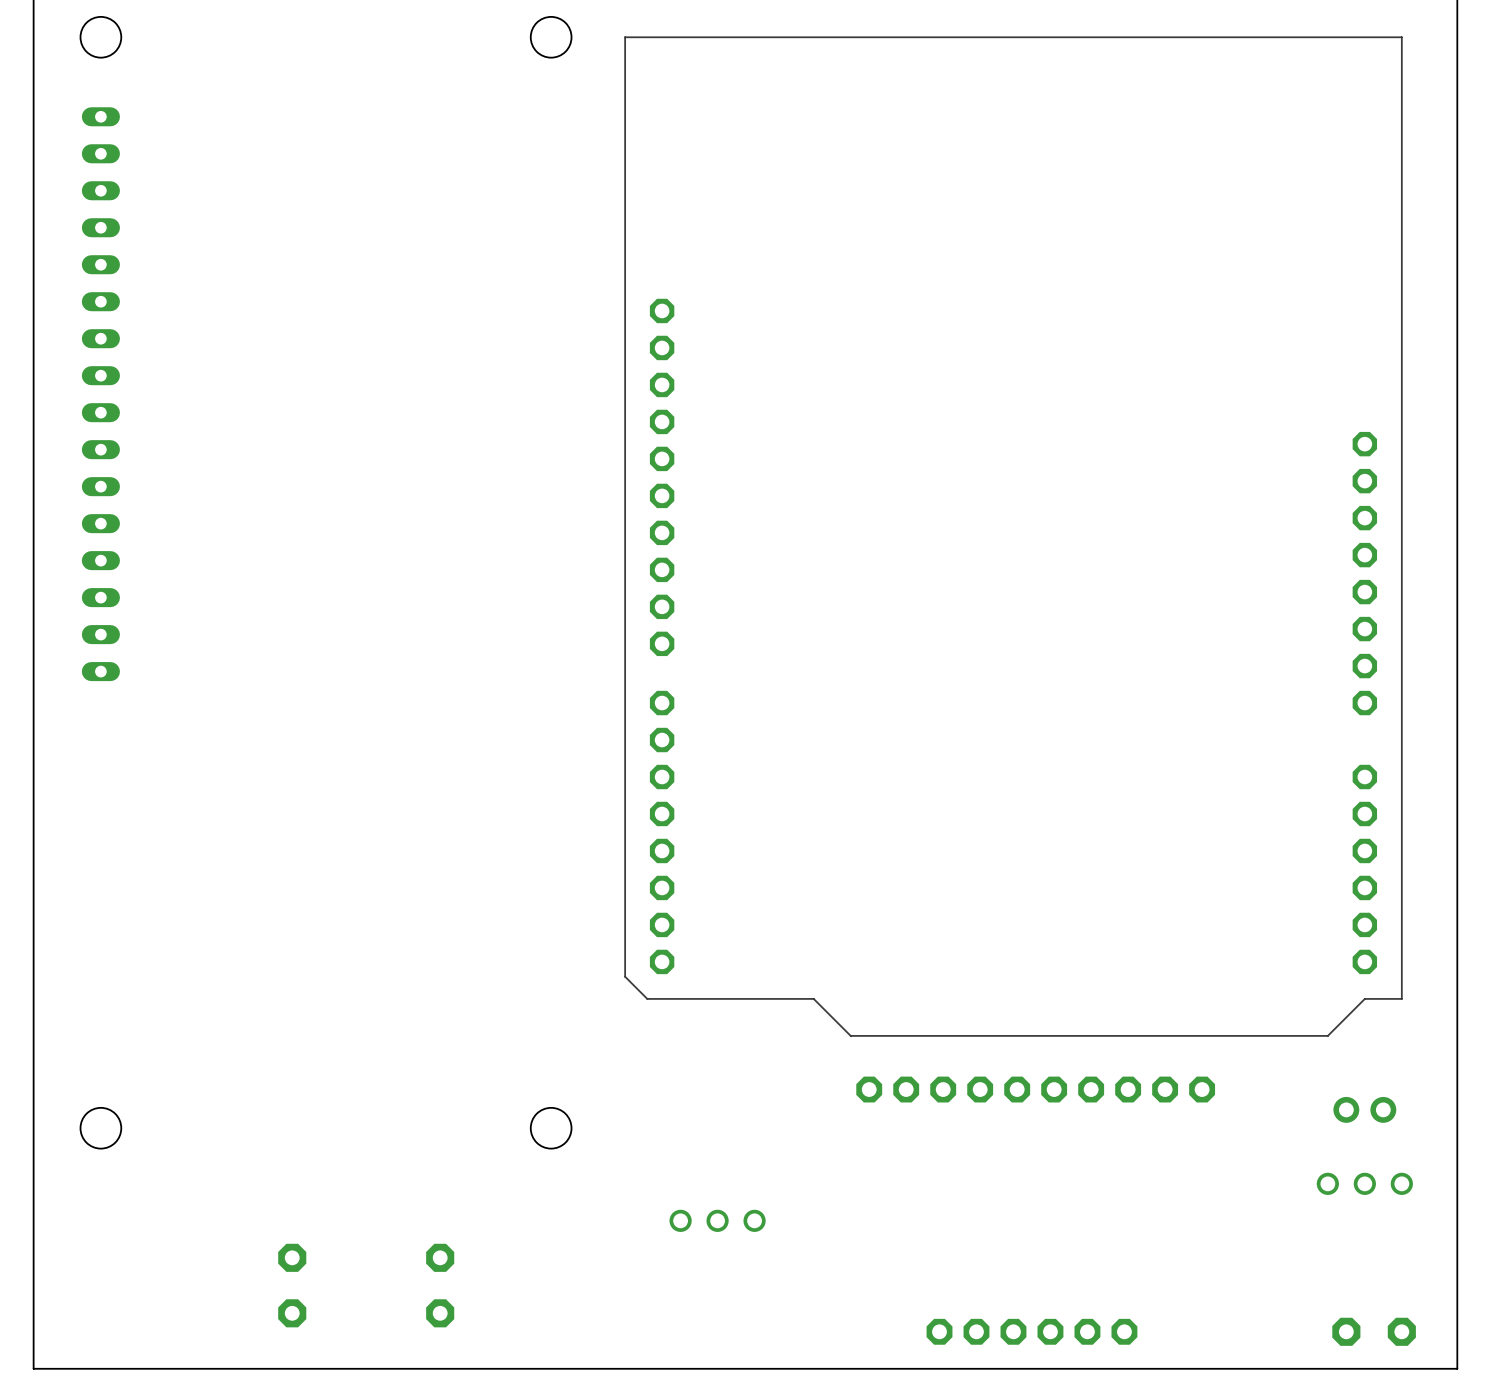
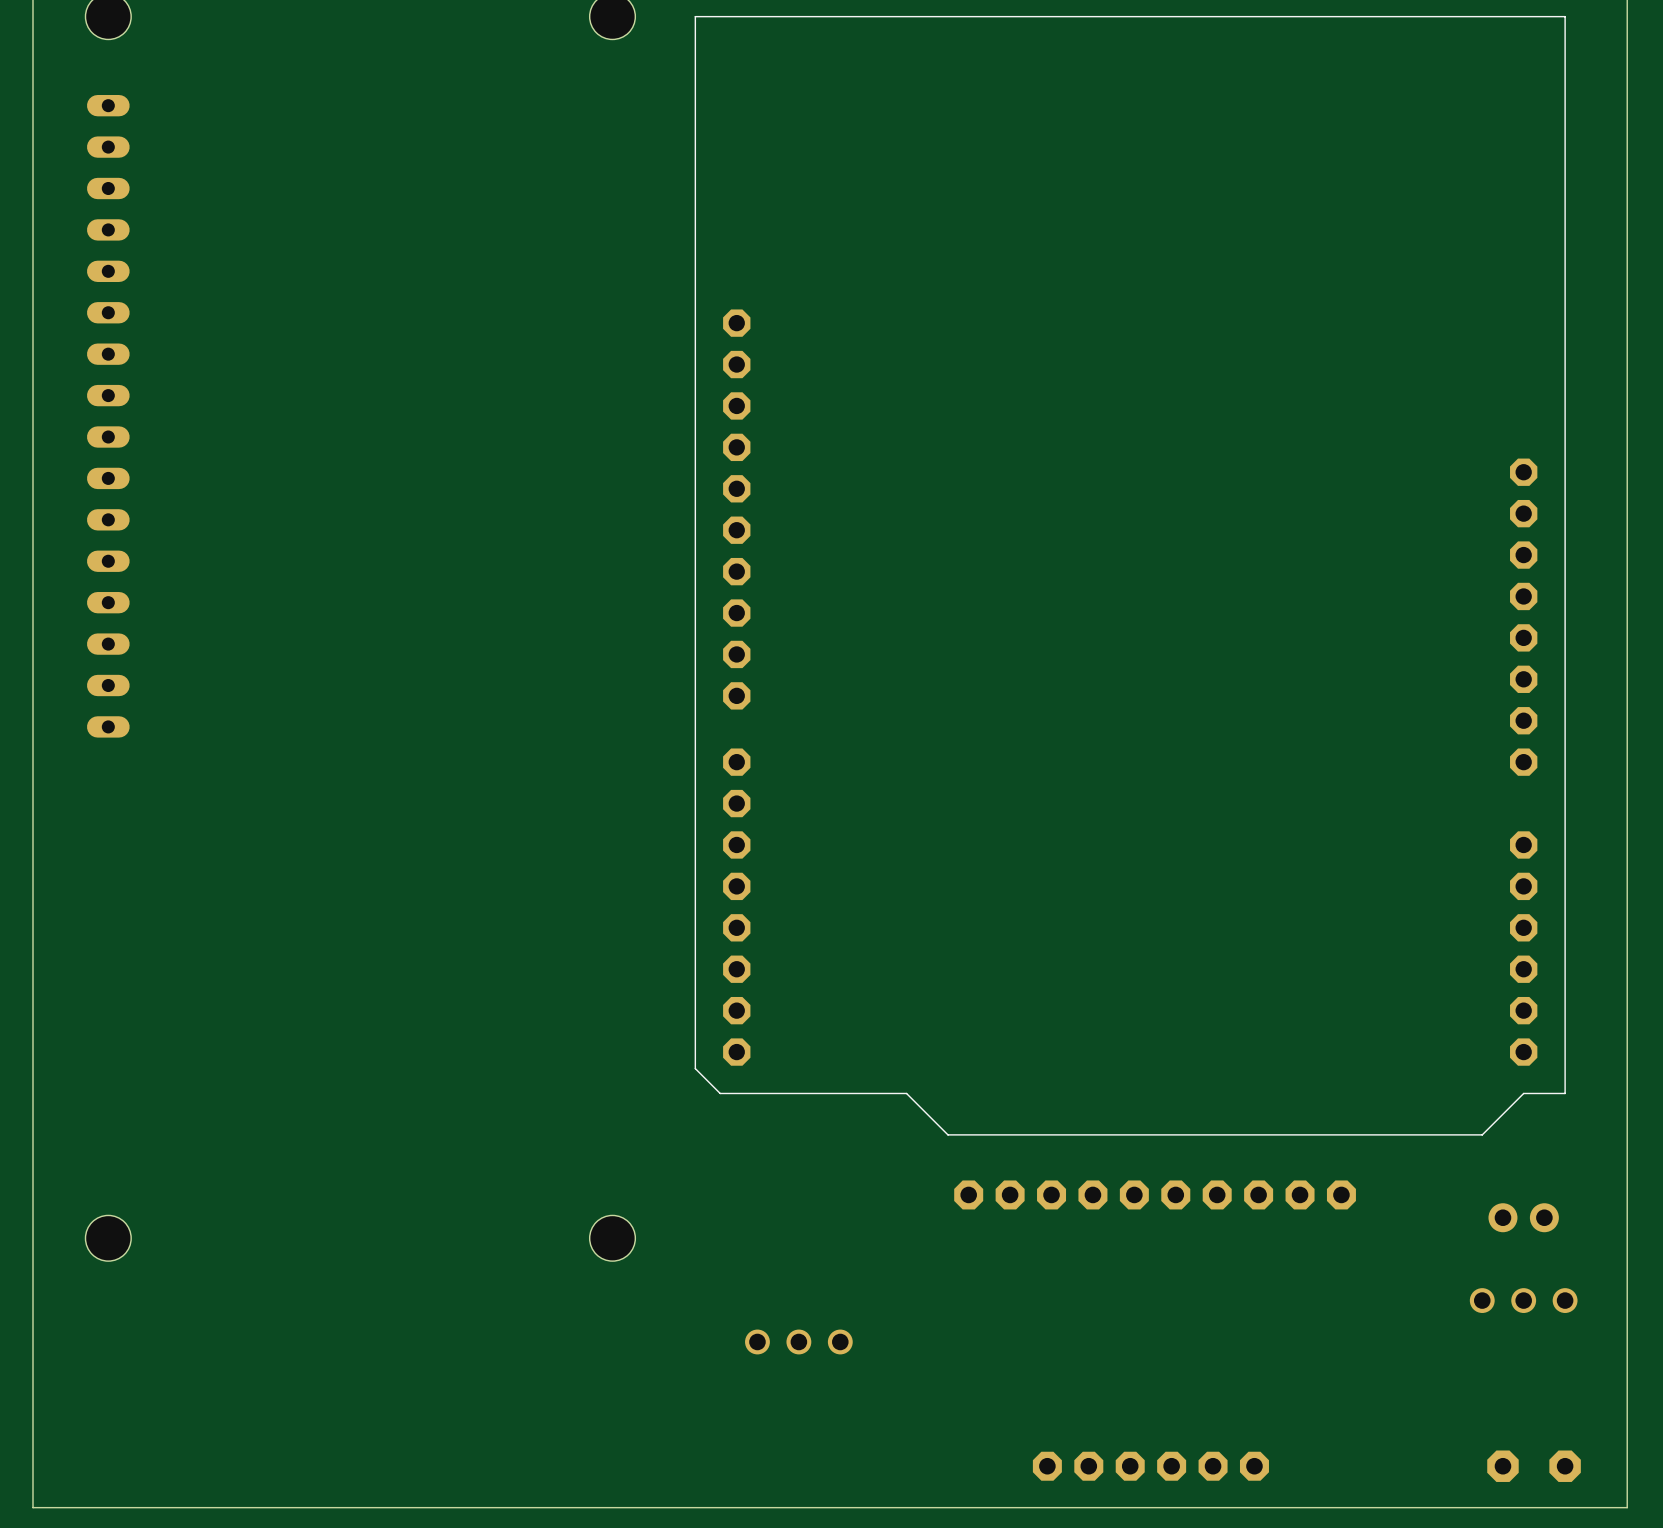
part: (292, 1257) -> none
part: (440, 1257) -> none
part: (292, 1313) -> none
part: (440, 1313) -> none

